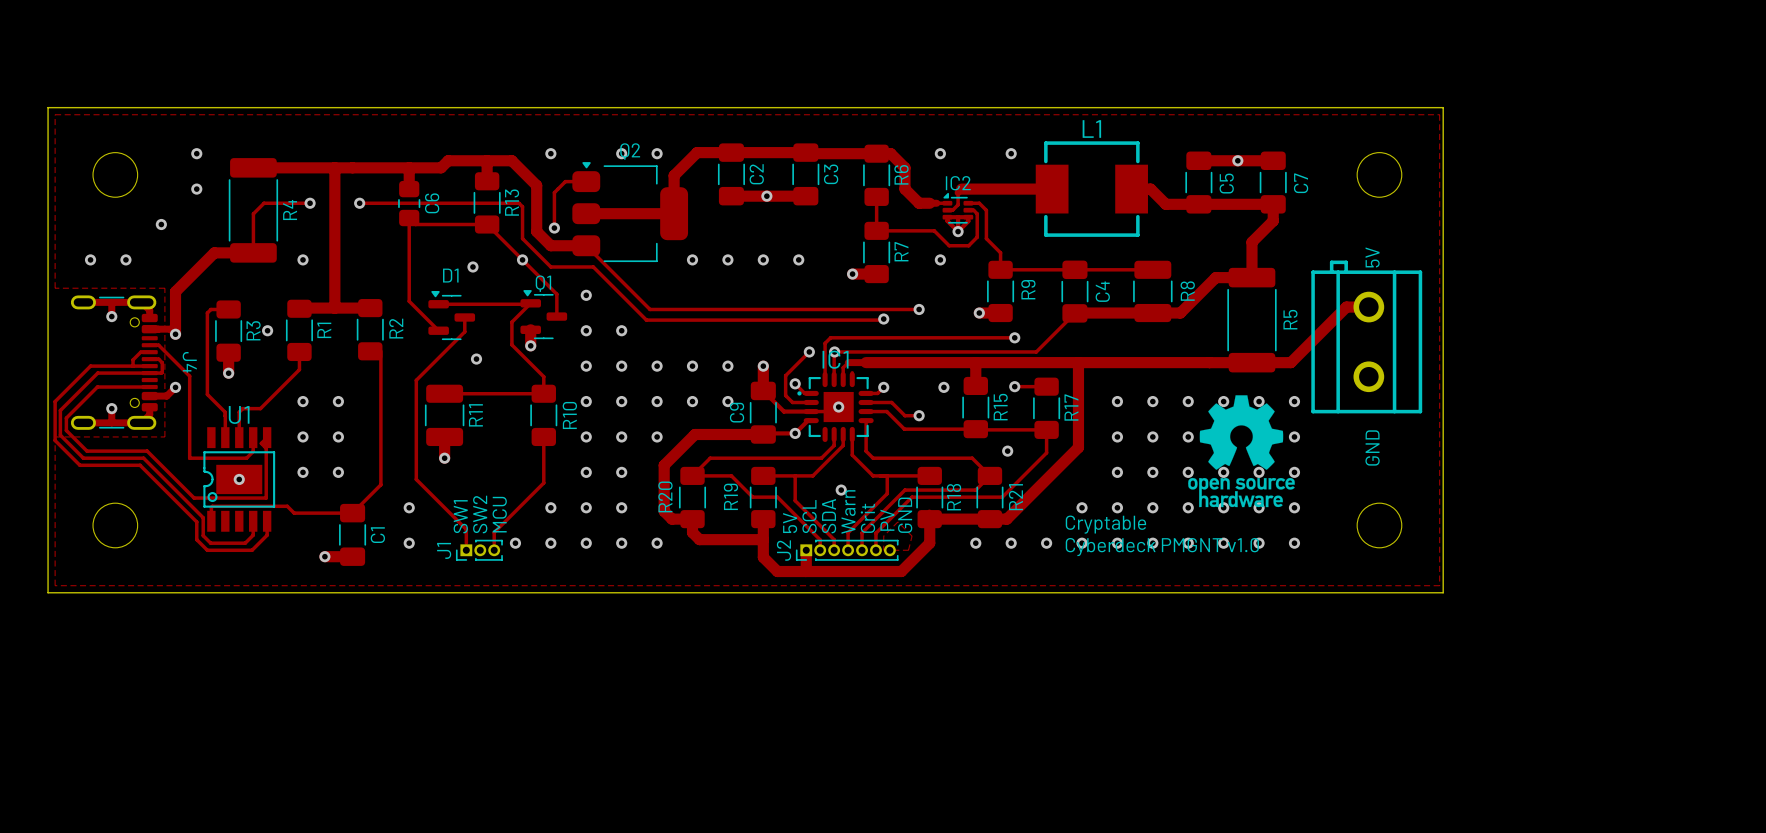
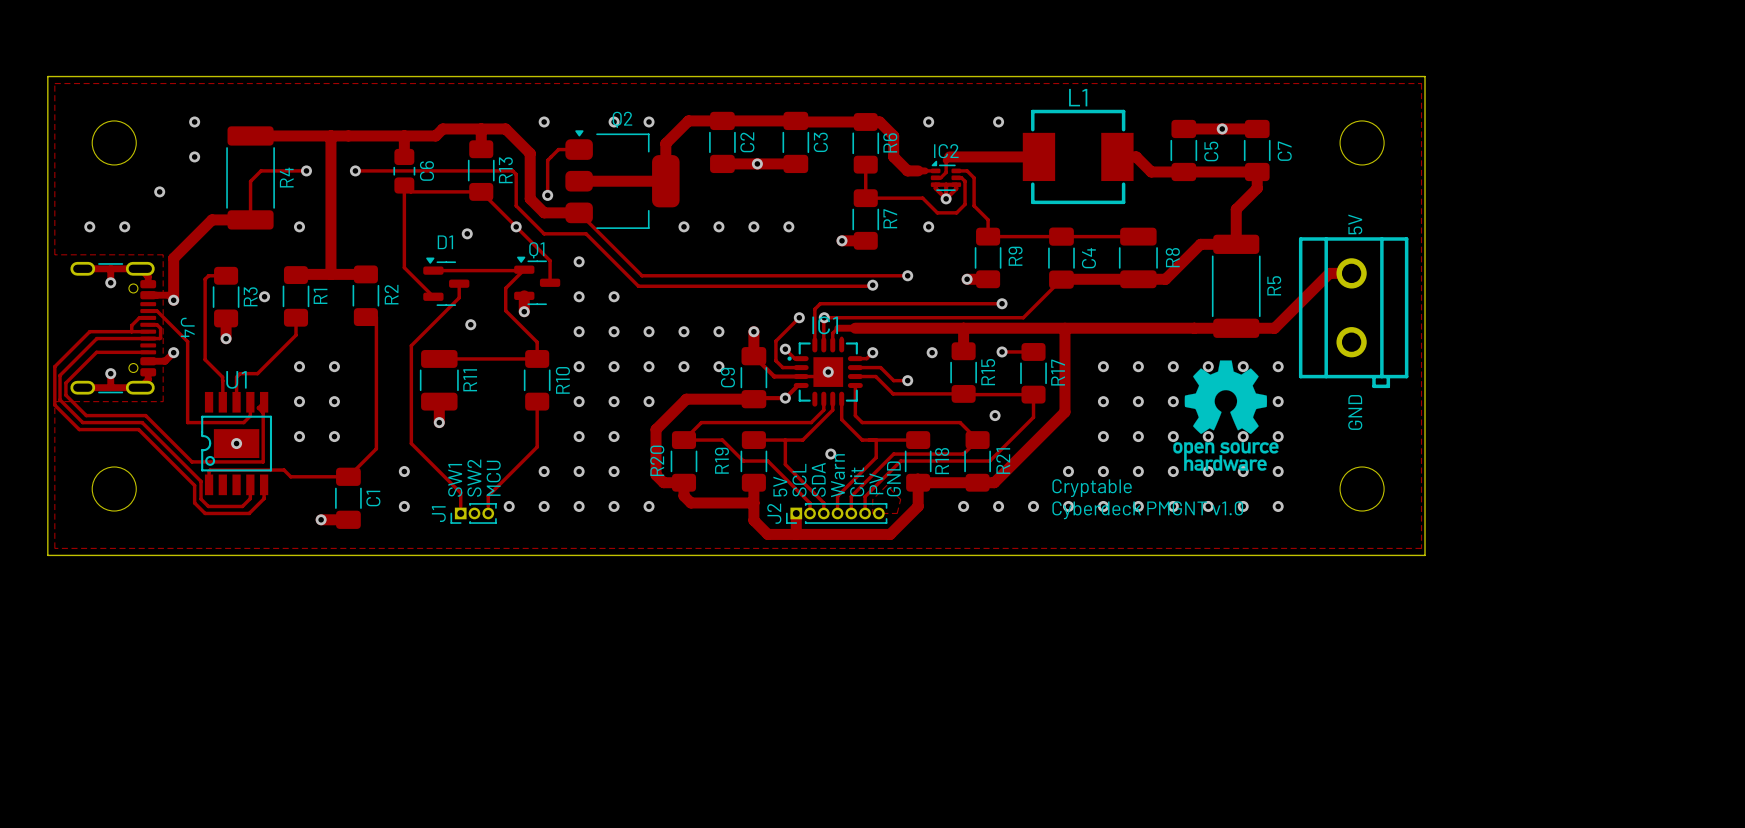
part rotation: 0° (1366, 336) -> 180° (1353, 312)

